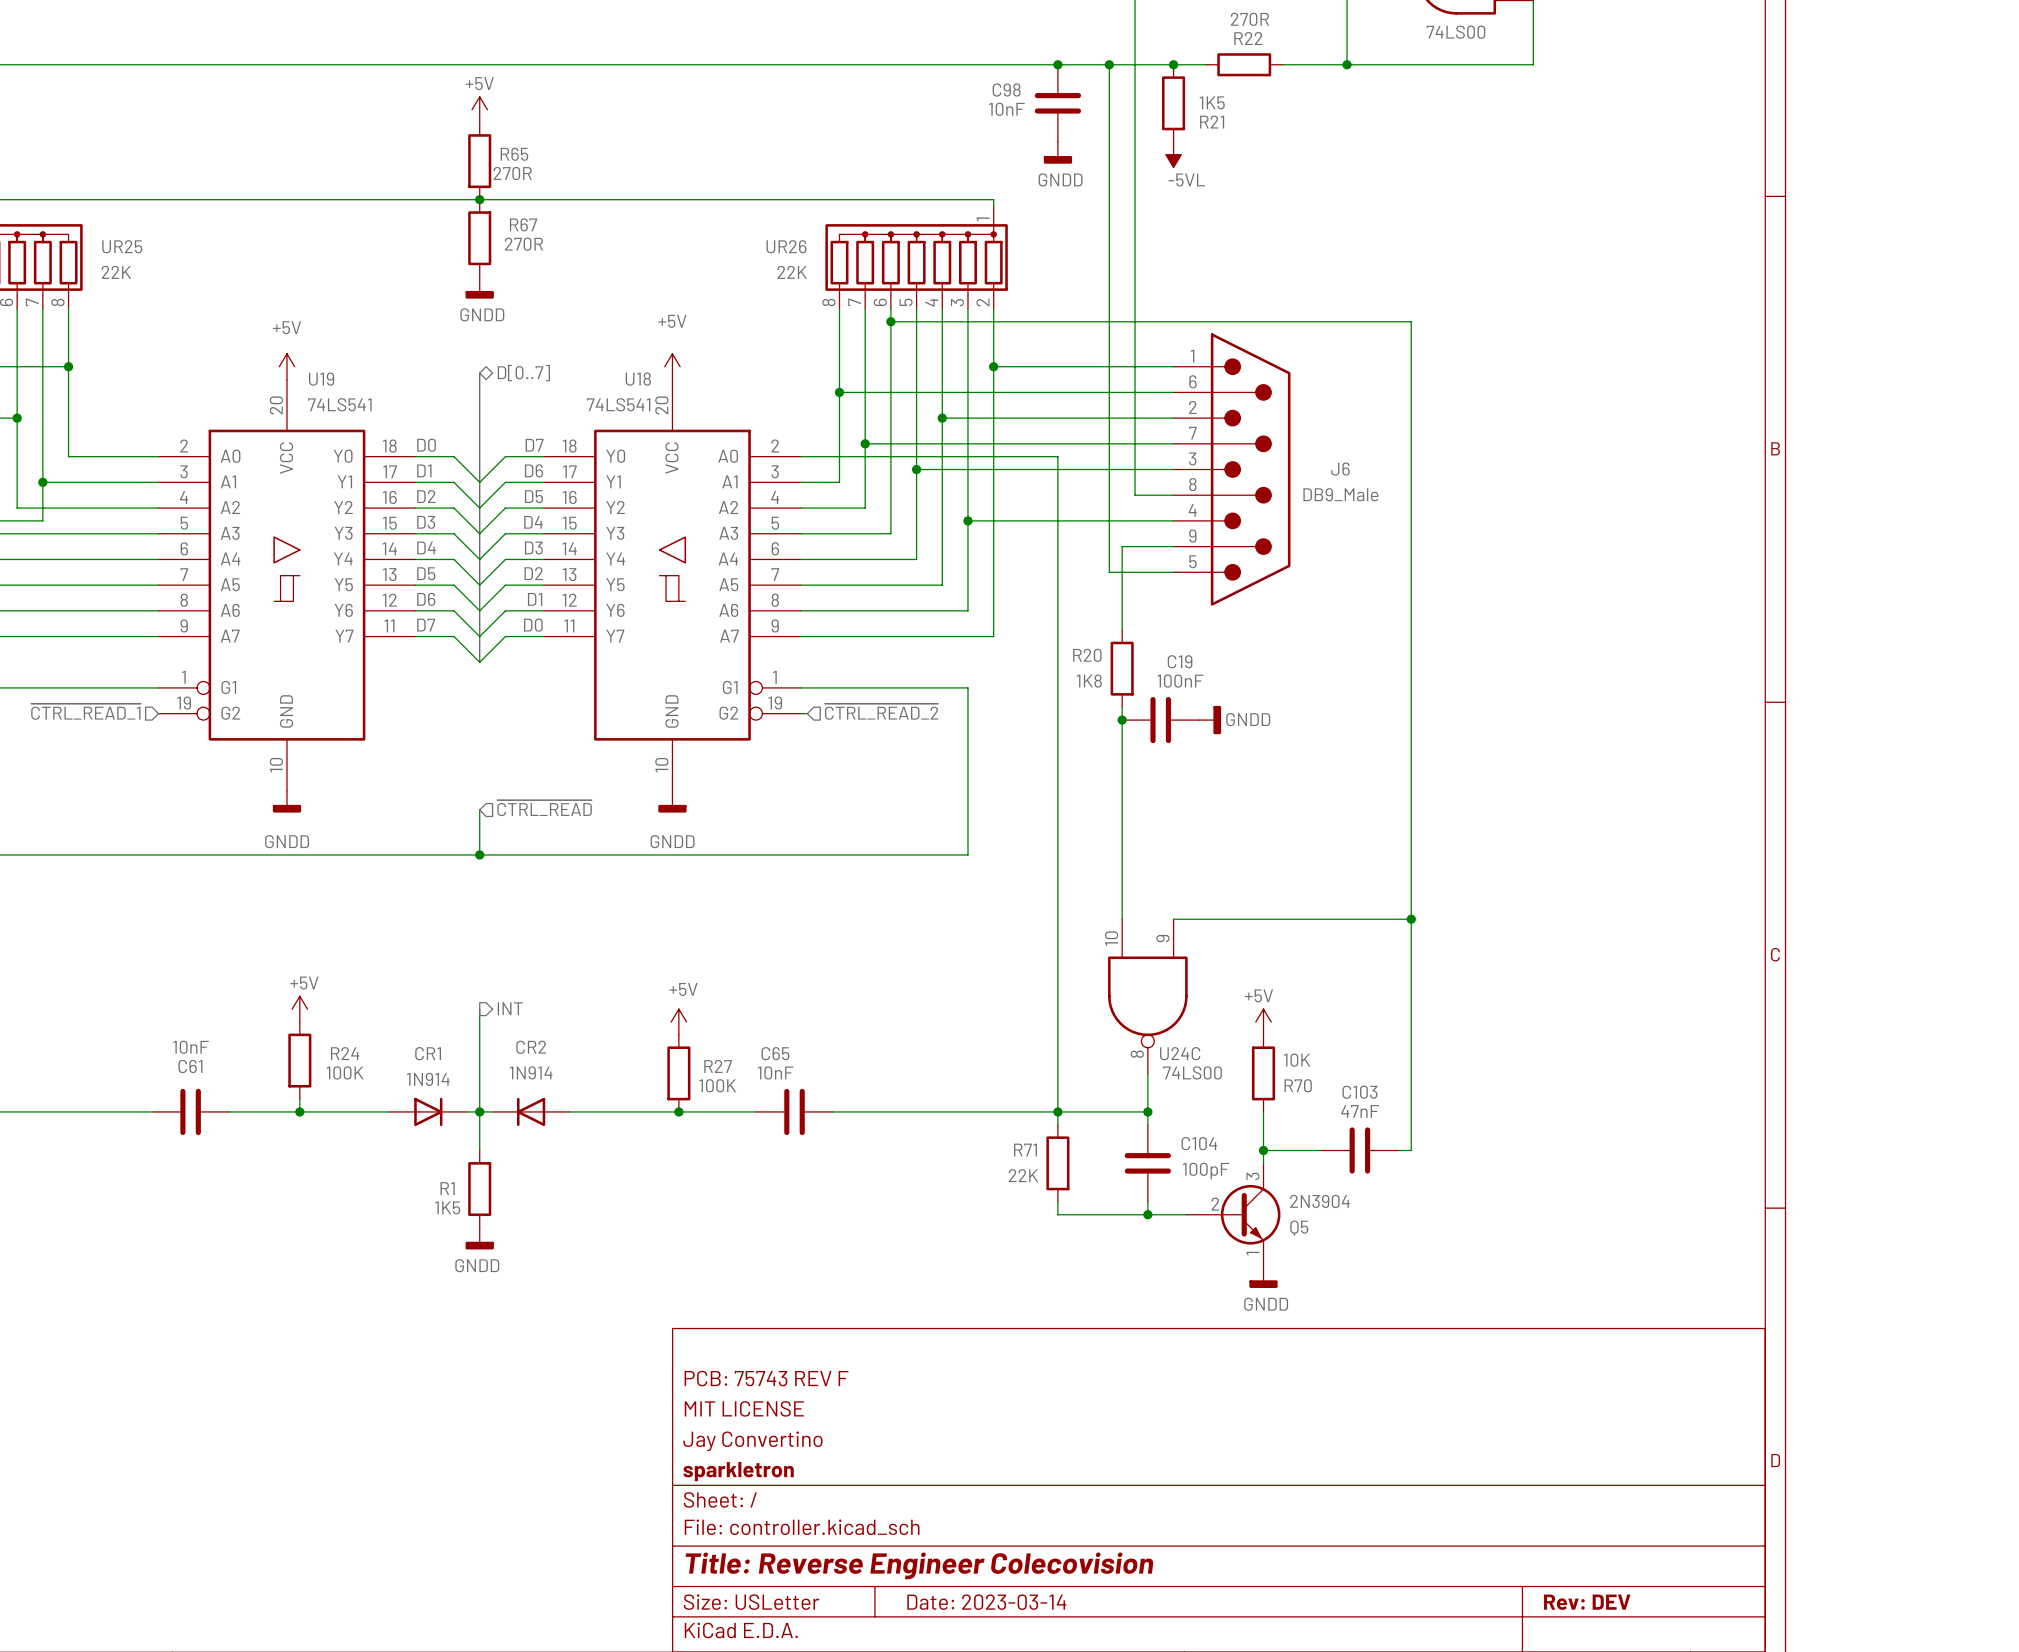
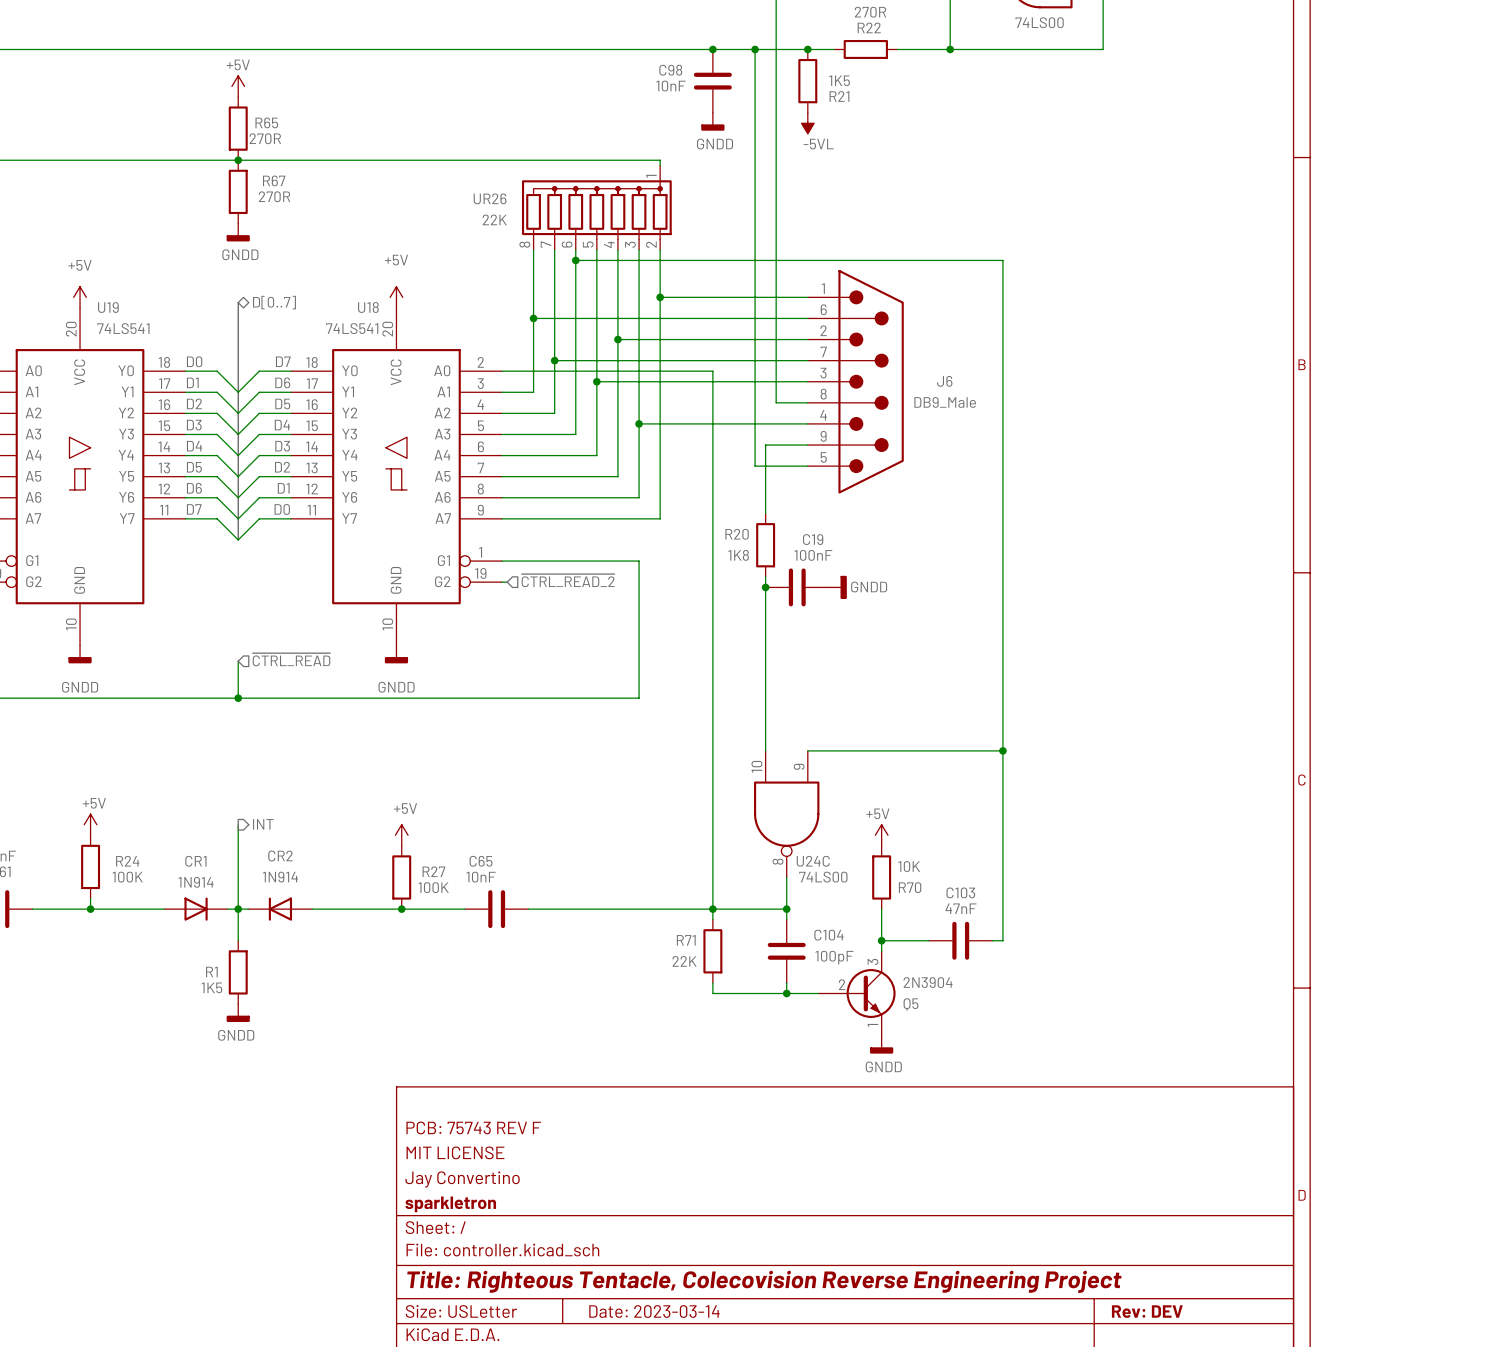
title block: Title: Reverse Engineer Colecovision (919, 1565) -> Title: Righteous Tentacle, Colecovision Reverse Engineering Project (764, 1281)

